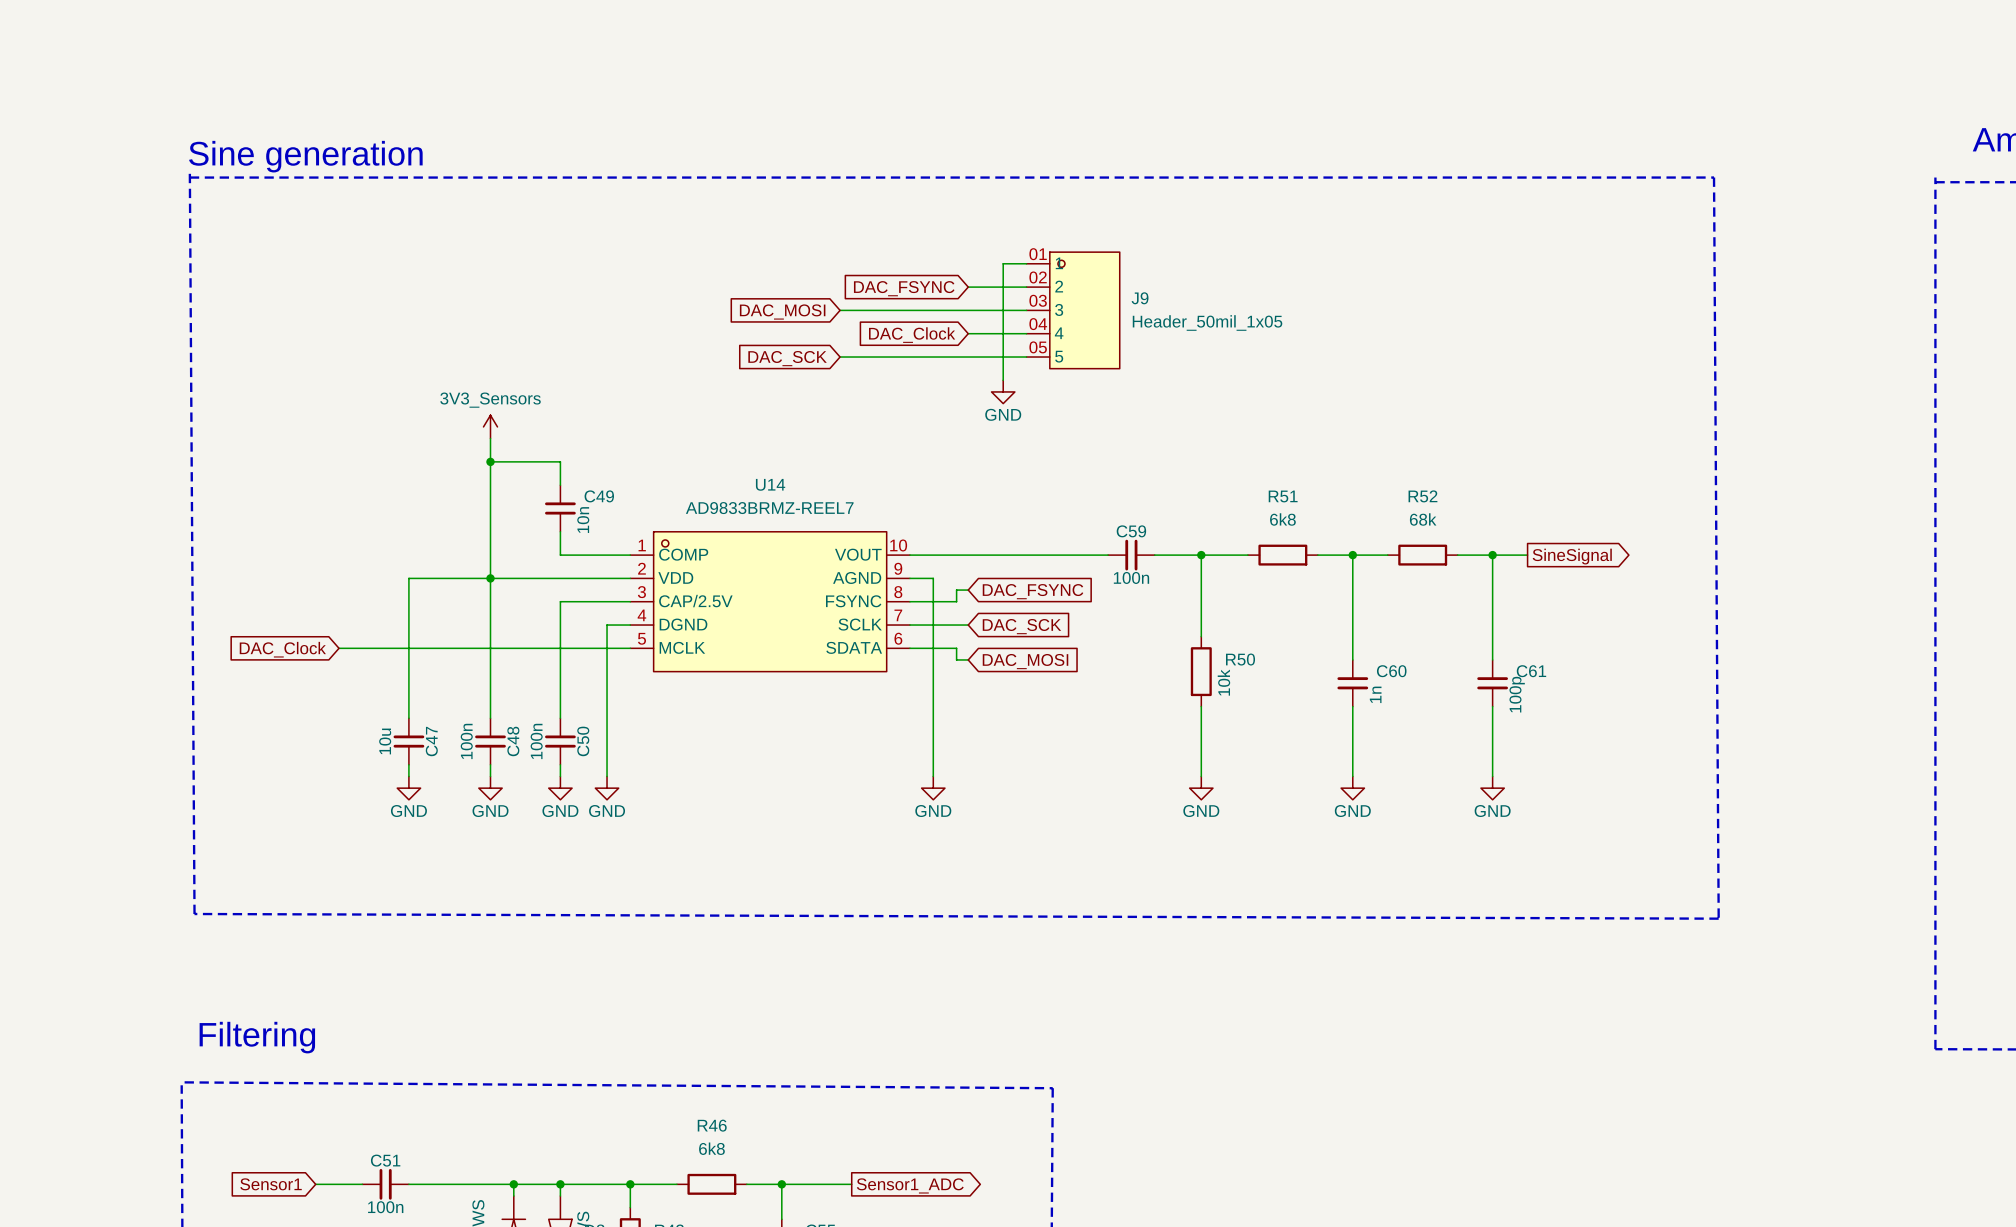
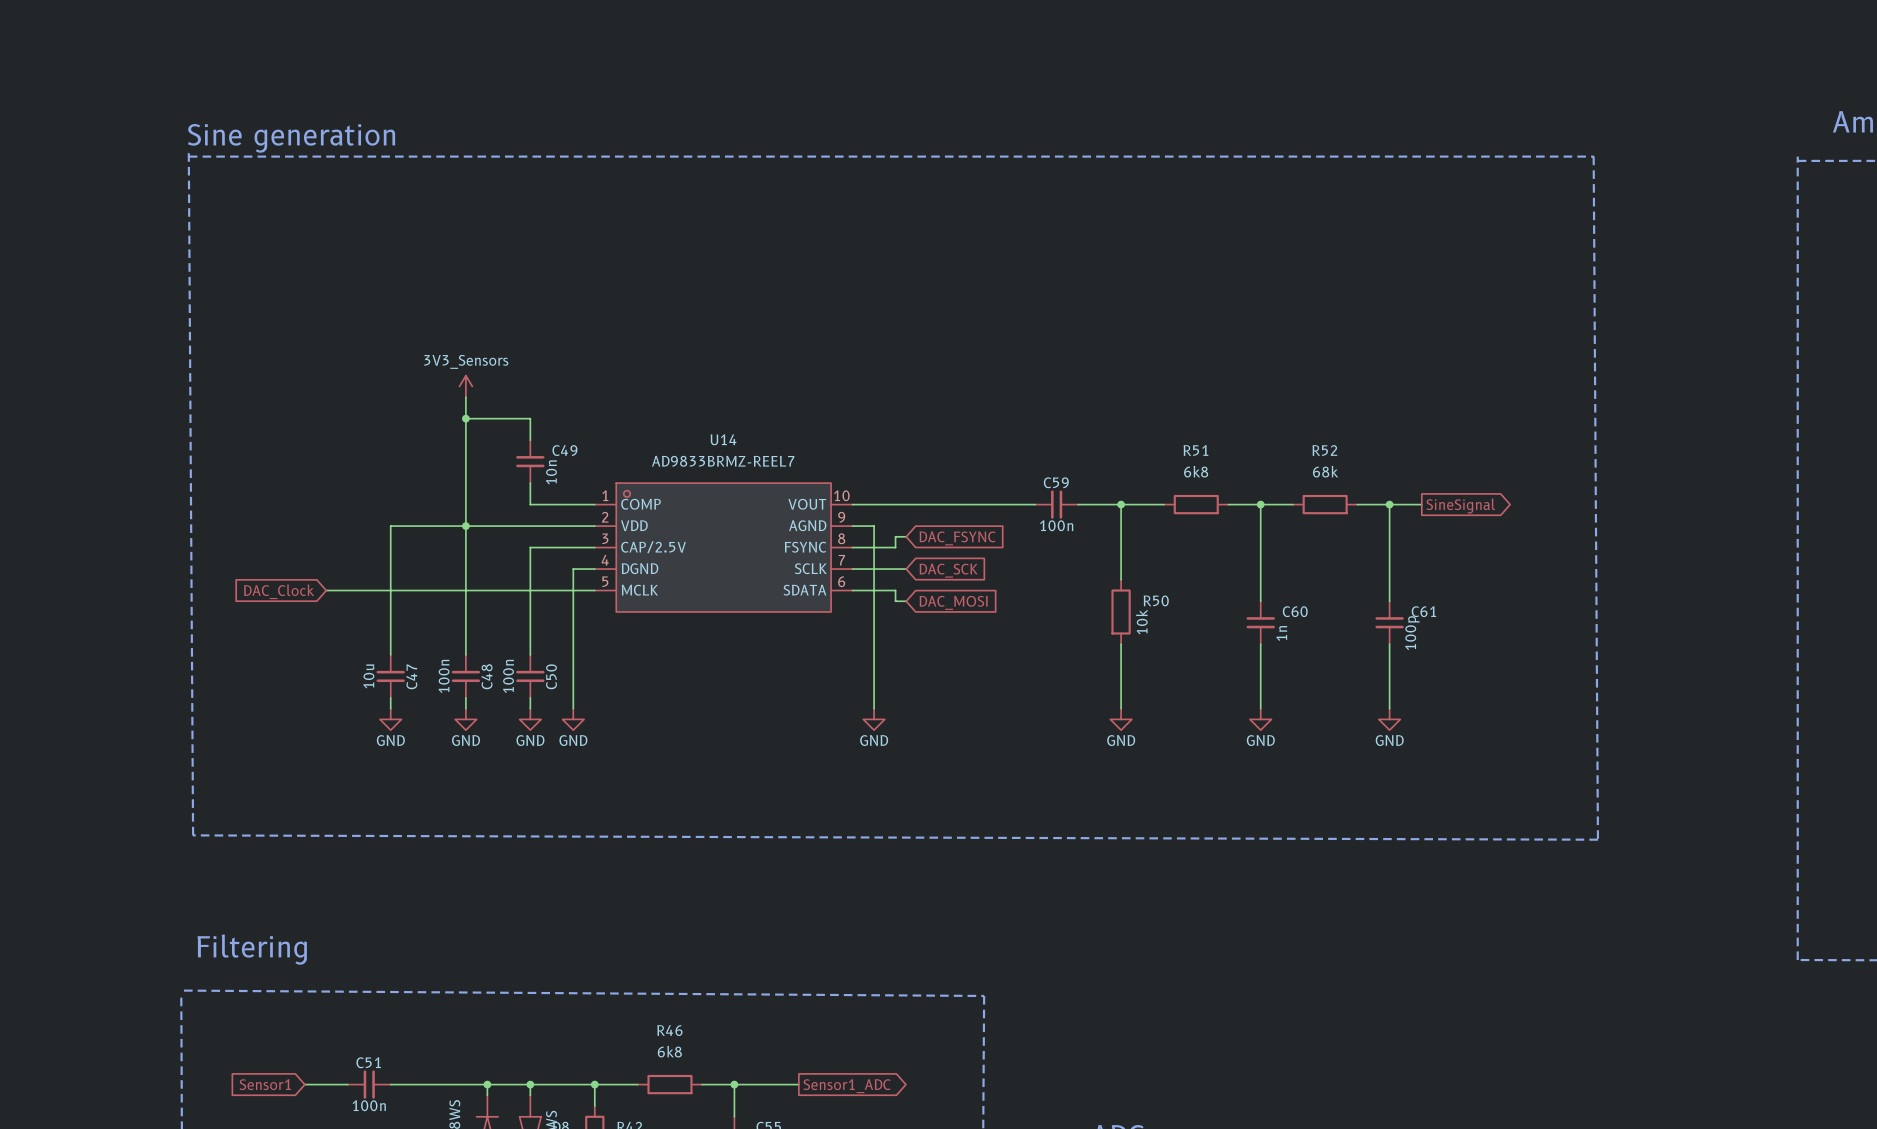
wire: (1026, 263) (1003, 263) (1003, 380) -> none
wire: (968, 287) (1026, 287) -> none
global label: DAC_FSYNC (904, 288) -> none
wire: (840, 310) (1026, 310) -> none
J9: Header_50mil_1x05 (1073, 310) -> none
global label: DAC_MOSI (782, 311) -> none
wire: (968, 333) (1026, 333) -> none
global label: DAC_Clock (912, 335) -> none
wire: (840, 357) (1026, 357) -> none
global label: DAC_SCK (787, 358) -> none
power symbol: GND (1003, 391) -> none

